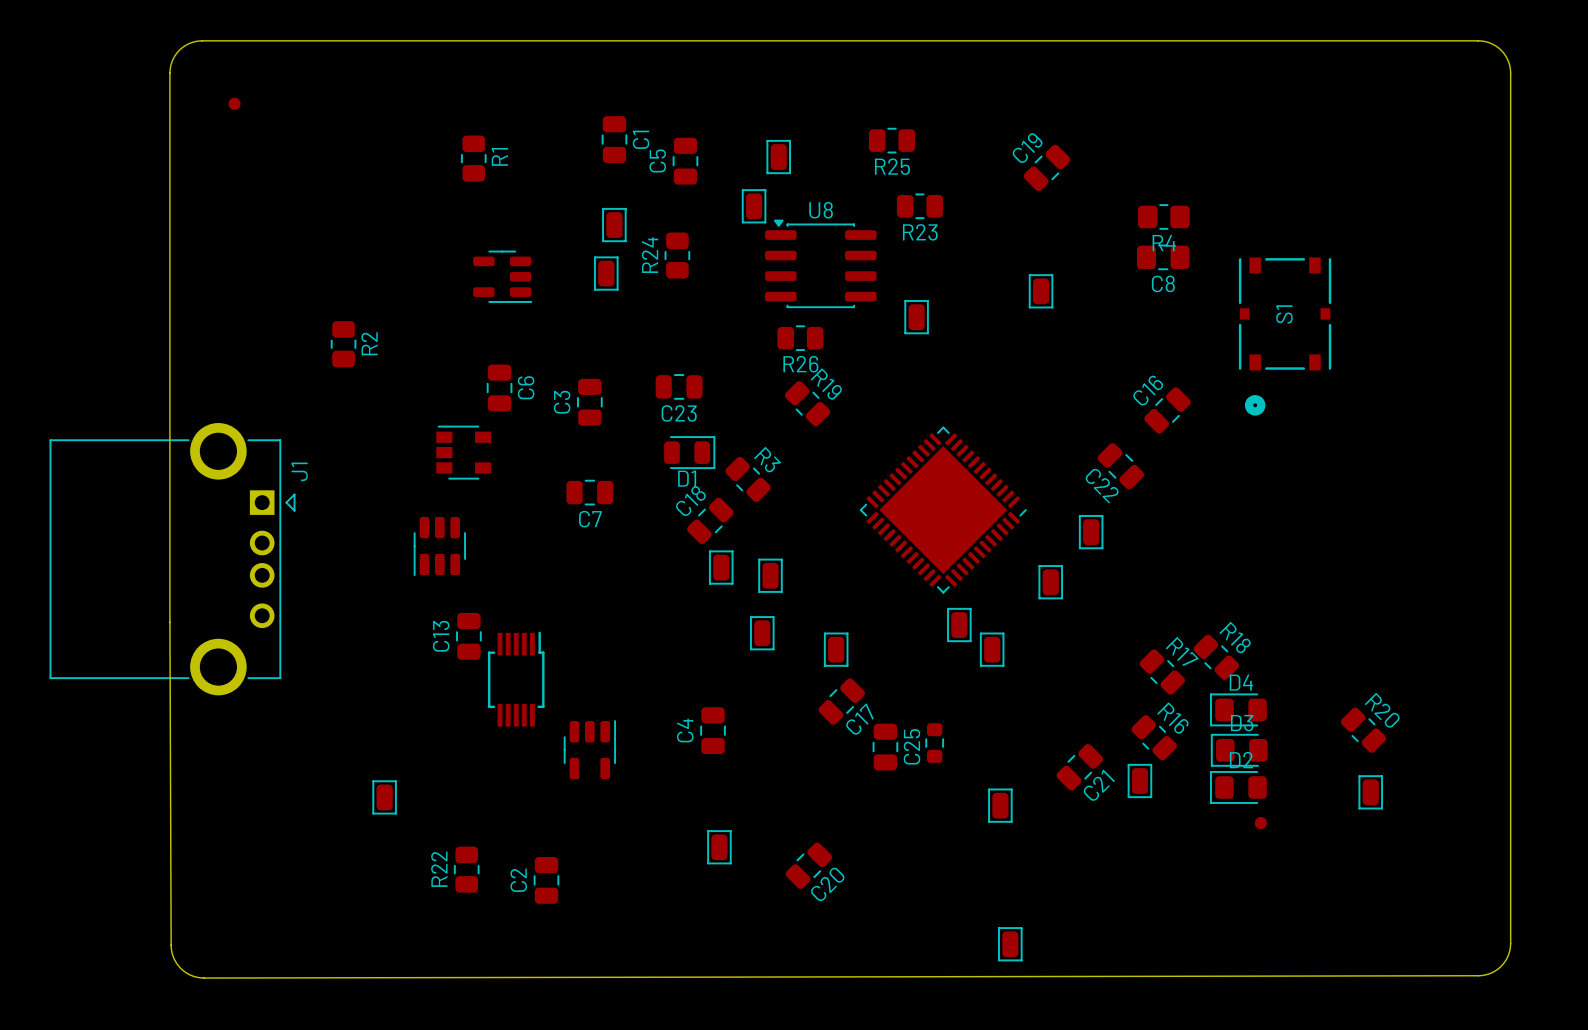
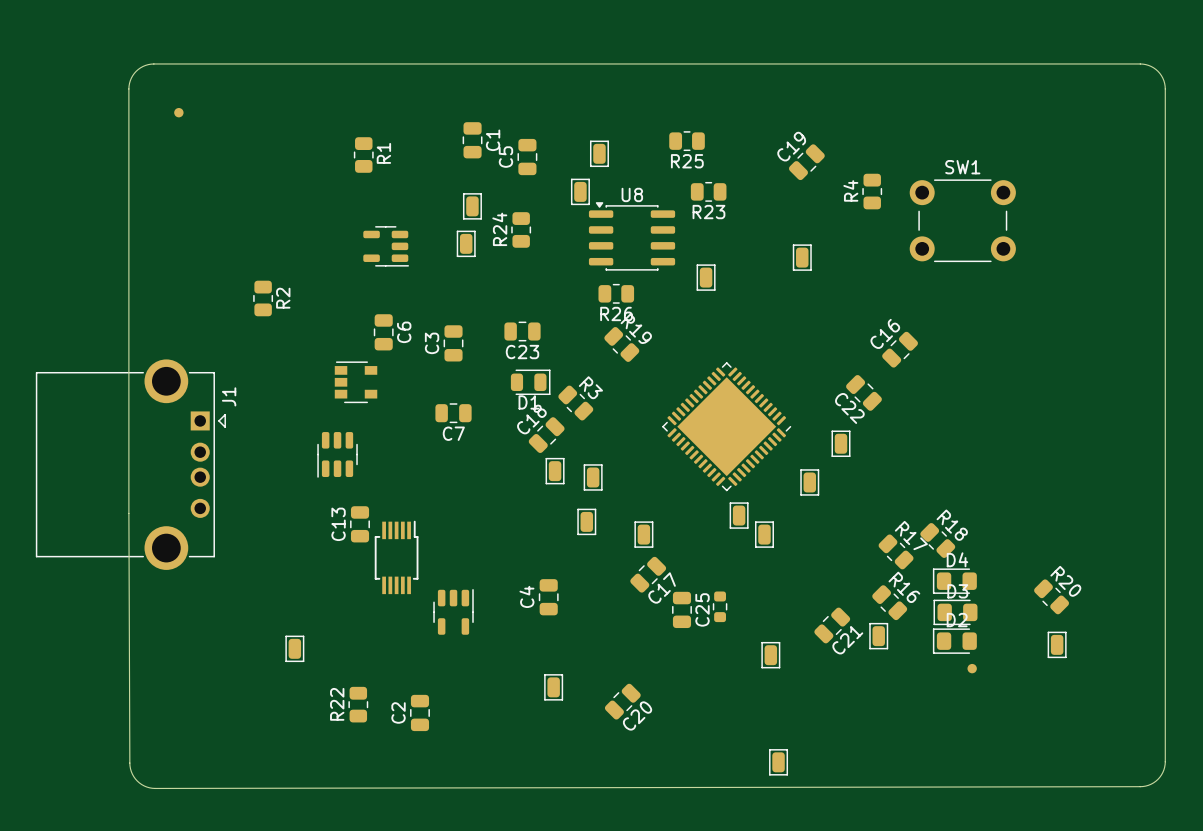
R4 footprint: [1138, 204, 1190, 230] -> [862, 173, 883, 210]
R4 name position: R4 (1164, 243) -> R4 (850, 190)
SW1: none -> (962, 220)
C8: (1163, 257) -> none
S1: (1285, 336) -> none

